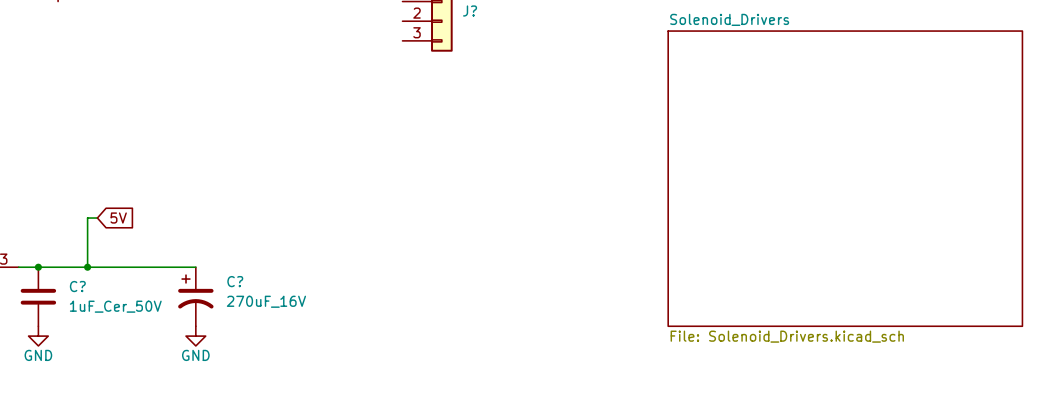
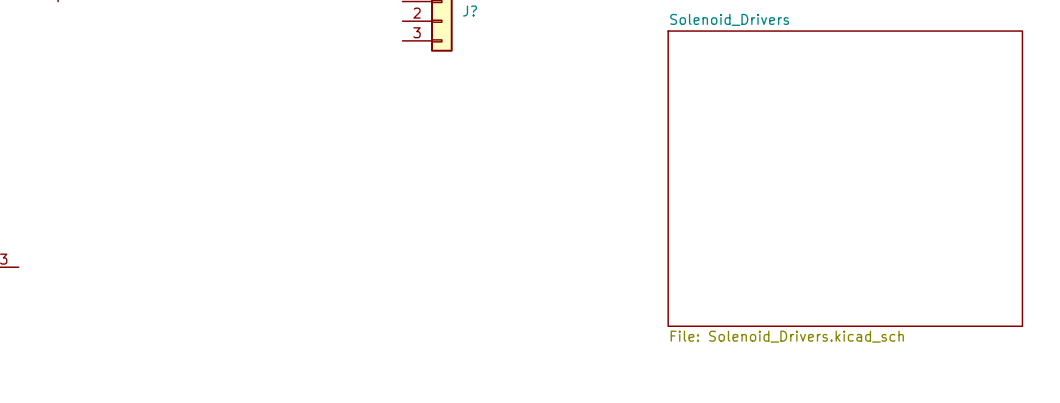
wire: (97, 218) (87, 218) (87, 267) -> none
global label: 5V (118, 218) -> none
wire: (18, 267) (195, 267) -> none
junction: (38, 267) -> none
junction: (87, 267) -> none
C?: 1uF_Cer_50V (38, 296) -> none
C?: 270uF_16V (195, 296) -> none
power symbol: GND (38, 336) -> none
power symbol: GND (195, 336) -> none

